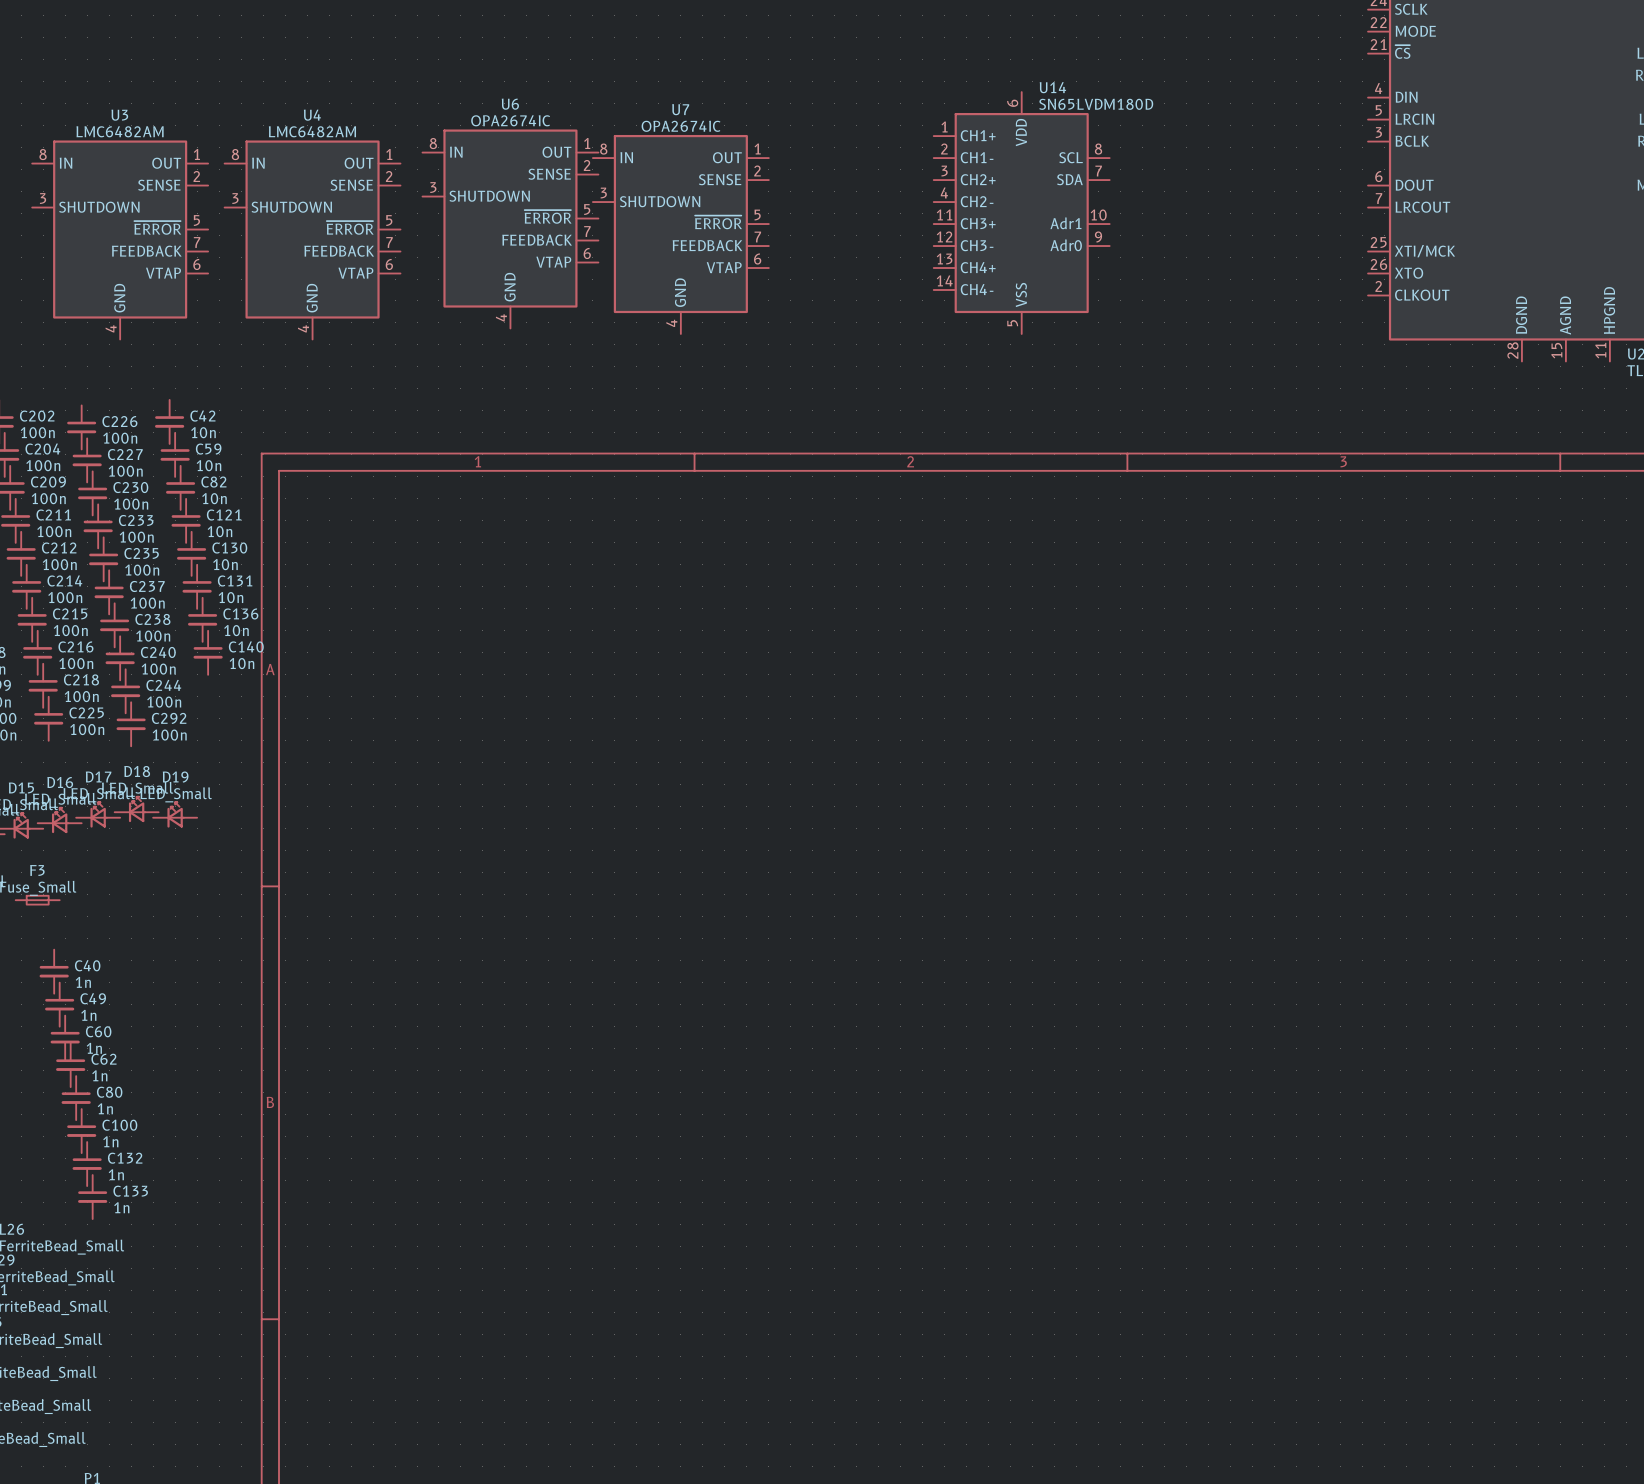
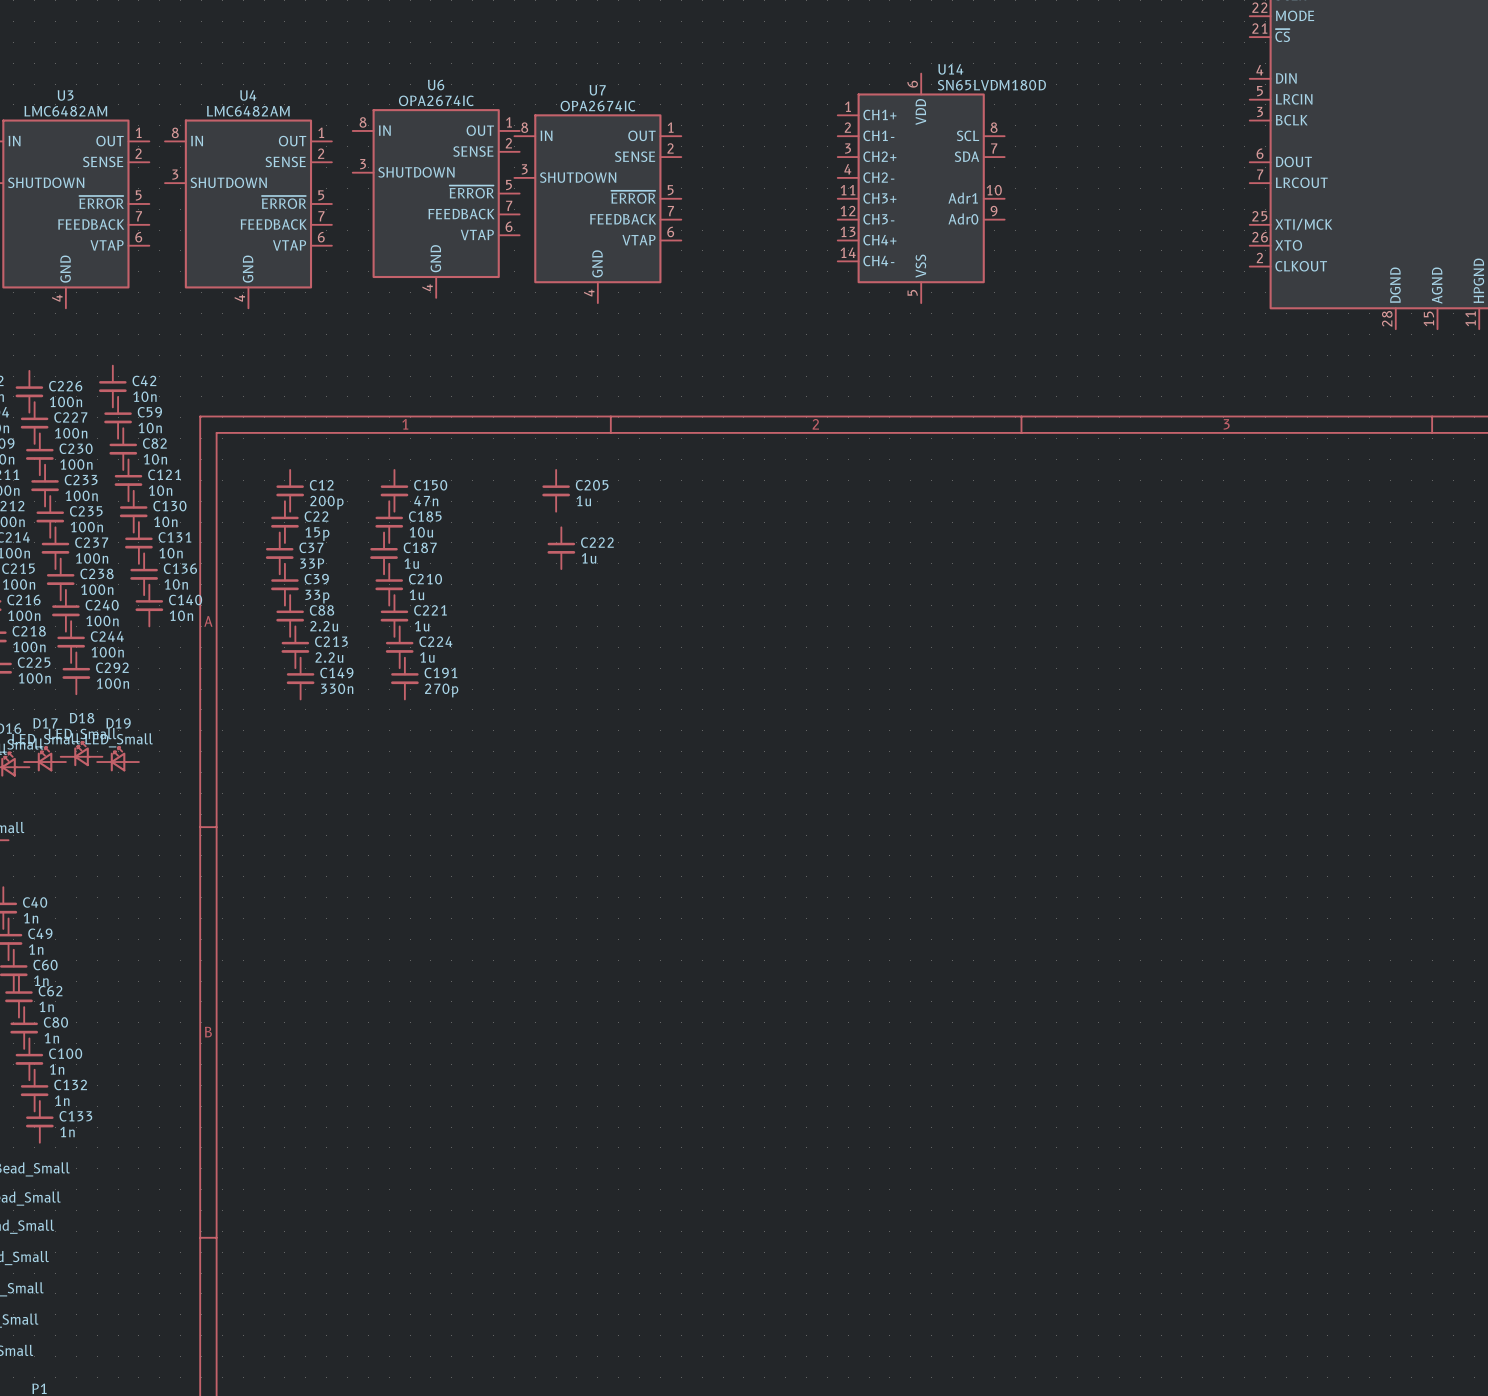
C12: none -> 200p (290, 490)
C150: none -> 47n (394, 490)
C205: none -> 1u (556, 490)
C22: none -> 15p (284, 522)
C185: none -> 10u (389, 522)
C222: none -> 1u (561, 548)
C37: none -> 33P (279, 553)
C187: none -> 1u (384, 553)
C39: none -> 33p (284, 584)
C210: none -> 1u (389, 584)
C88: none -> 2.2u (290, 615)
C221: none -> 1u (394, 615)
C213: none -> 2.2u (295, 647)
C224: none -> 1u (399, 647)
C149: none -> 330n (300, 678)
C191: none -> 270p (404, 678)

